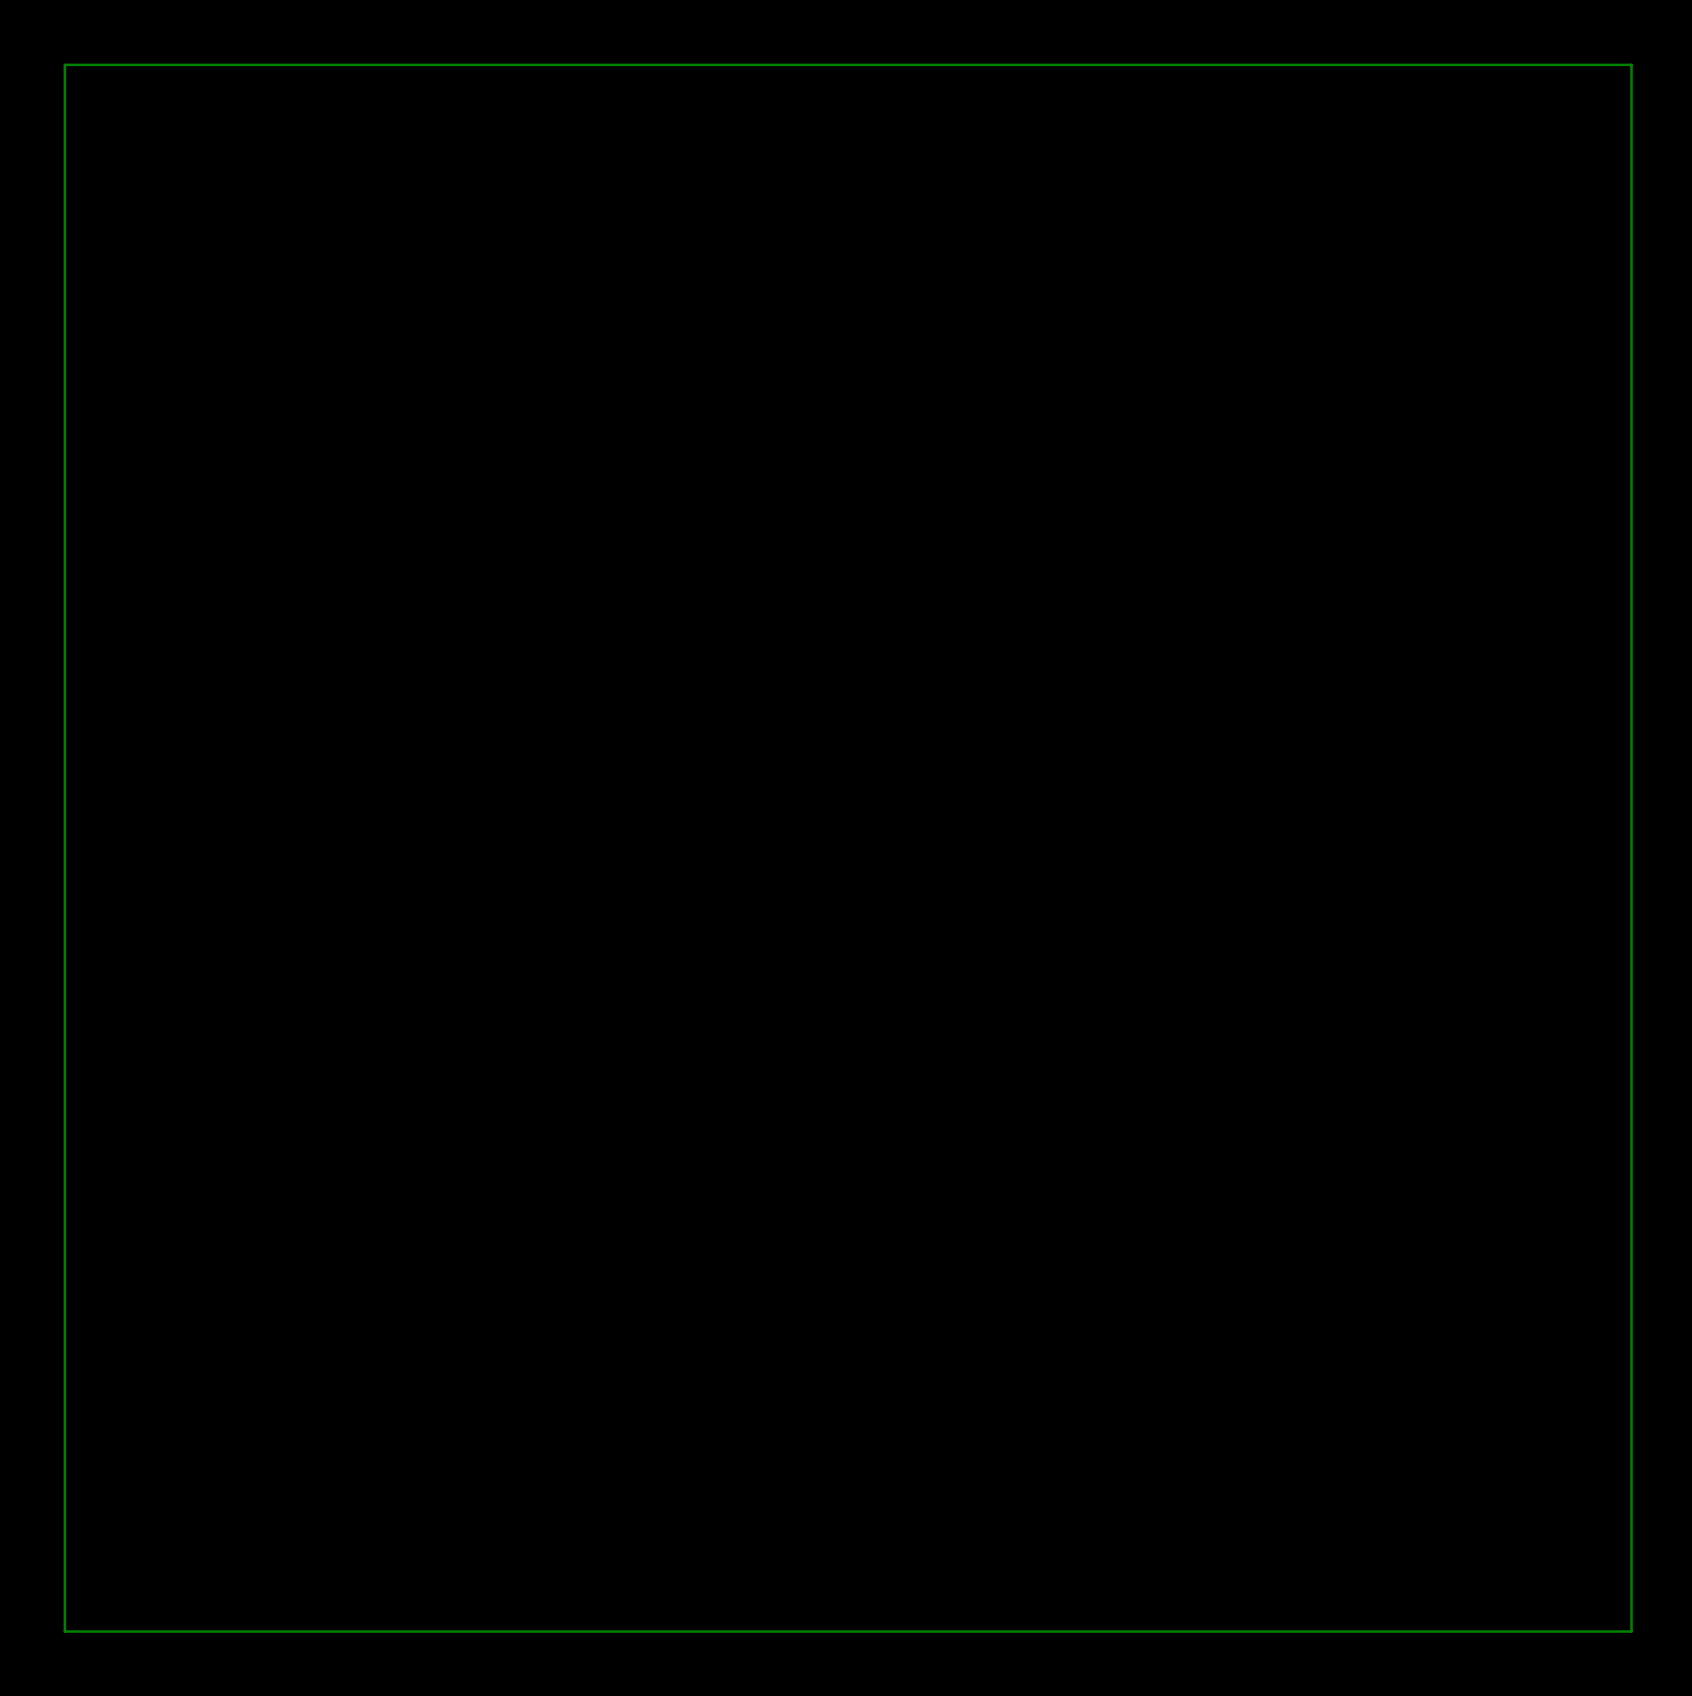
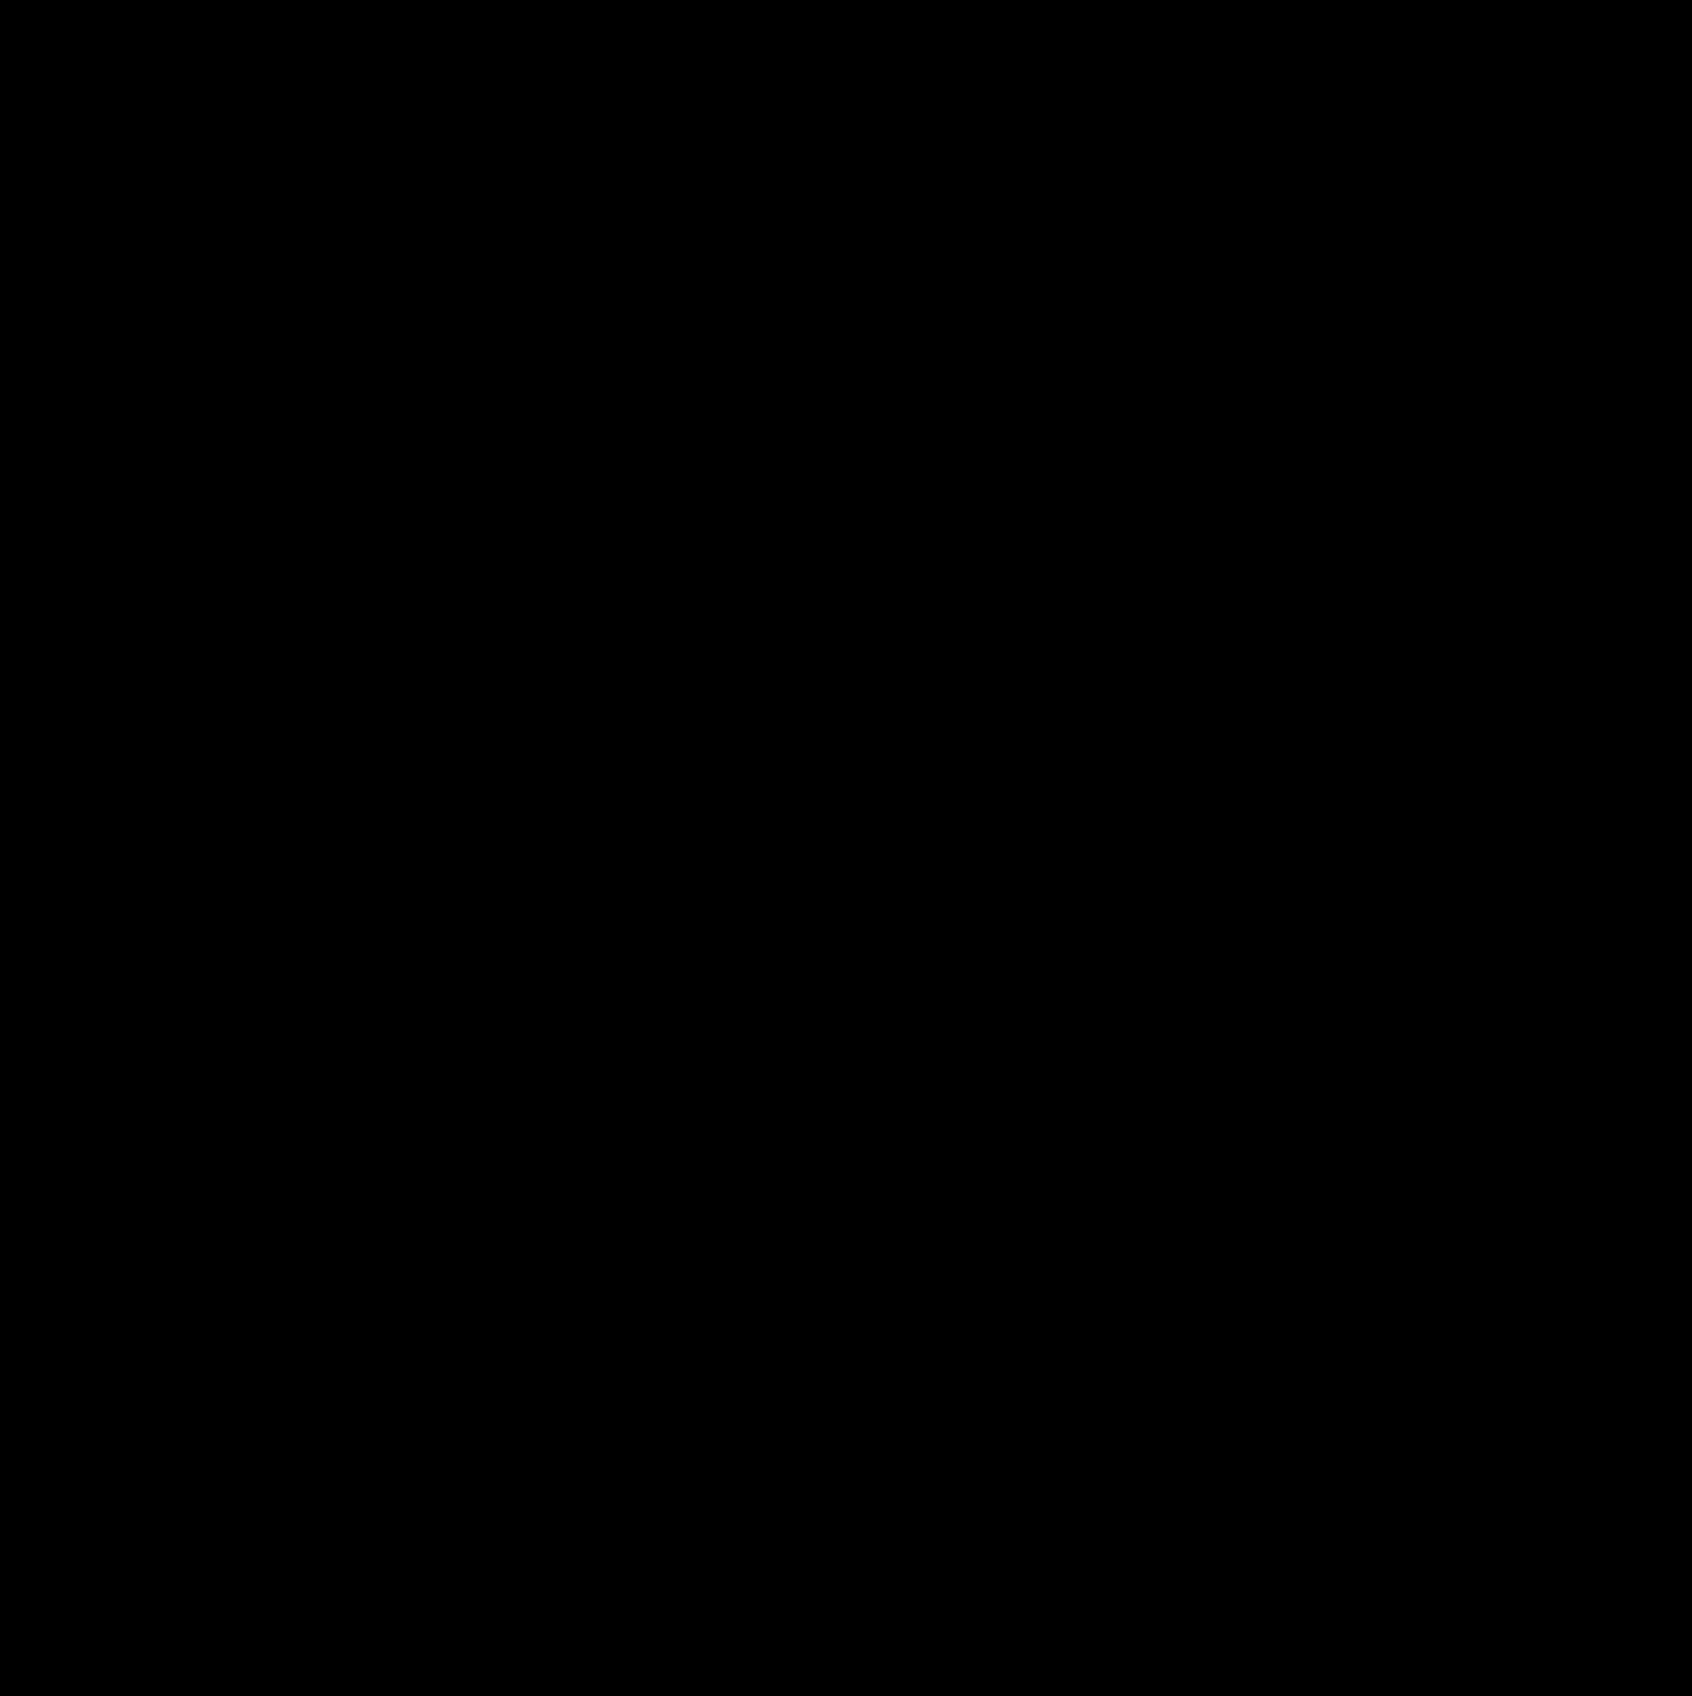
bottom track: (64, 64) (64, 1631) (1631, 1631) (1631, 64) (64, 64) -> none

